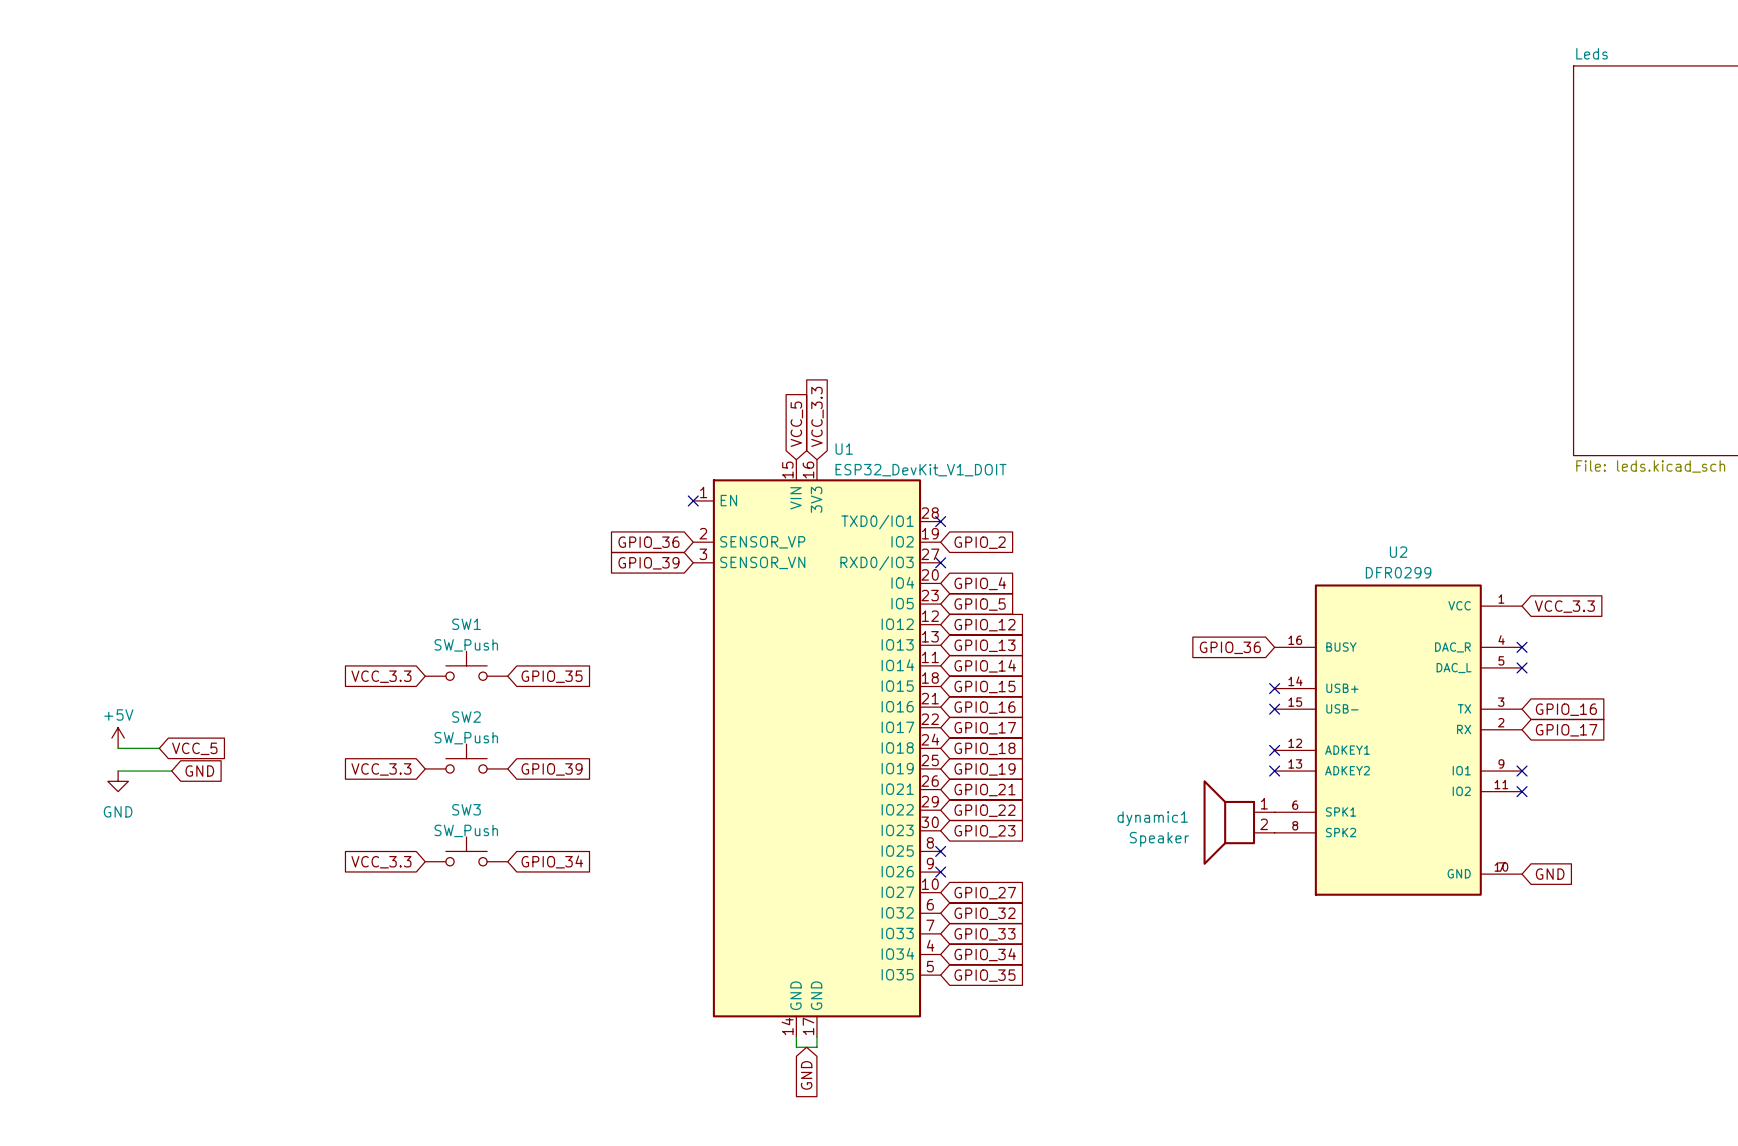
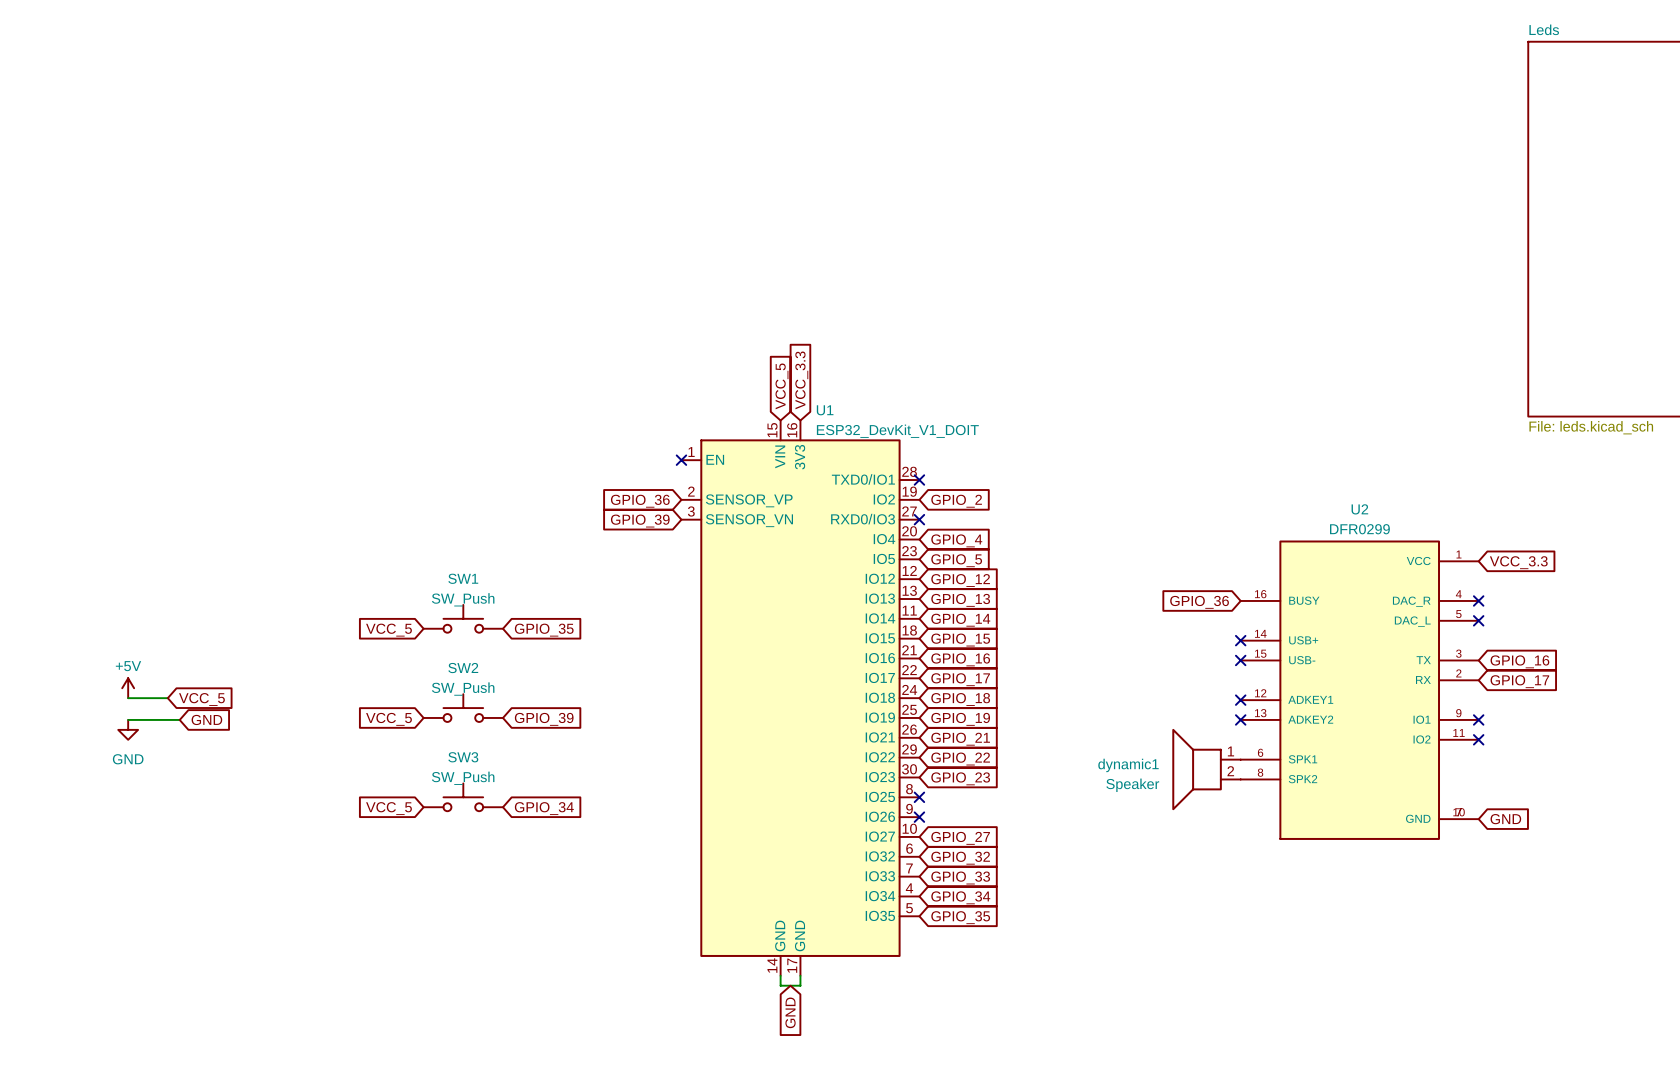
global label: VCC_3.3 (381, 676) -> VCC_5 (388, 630)
global label: VCC_3.3 (381, 769) -> VCC_5 (388, 719)
global label: VCC_3.3 (381, 862) -> VCC_5 (388, 808)

